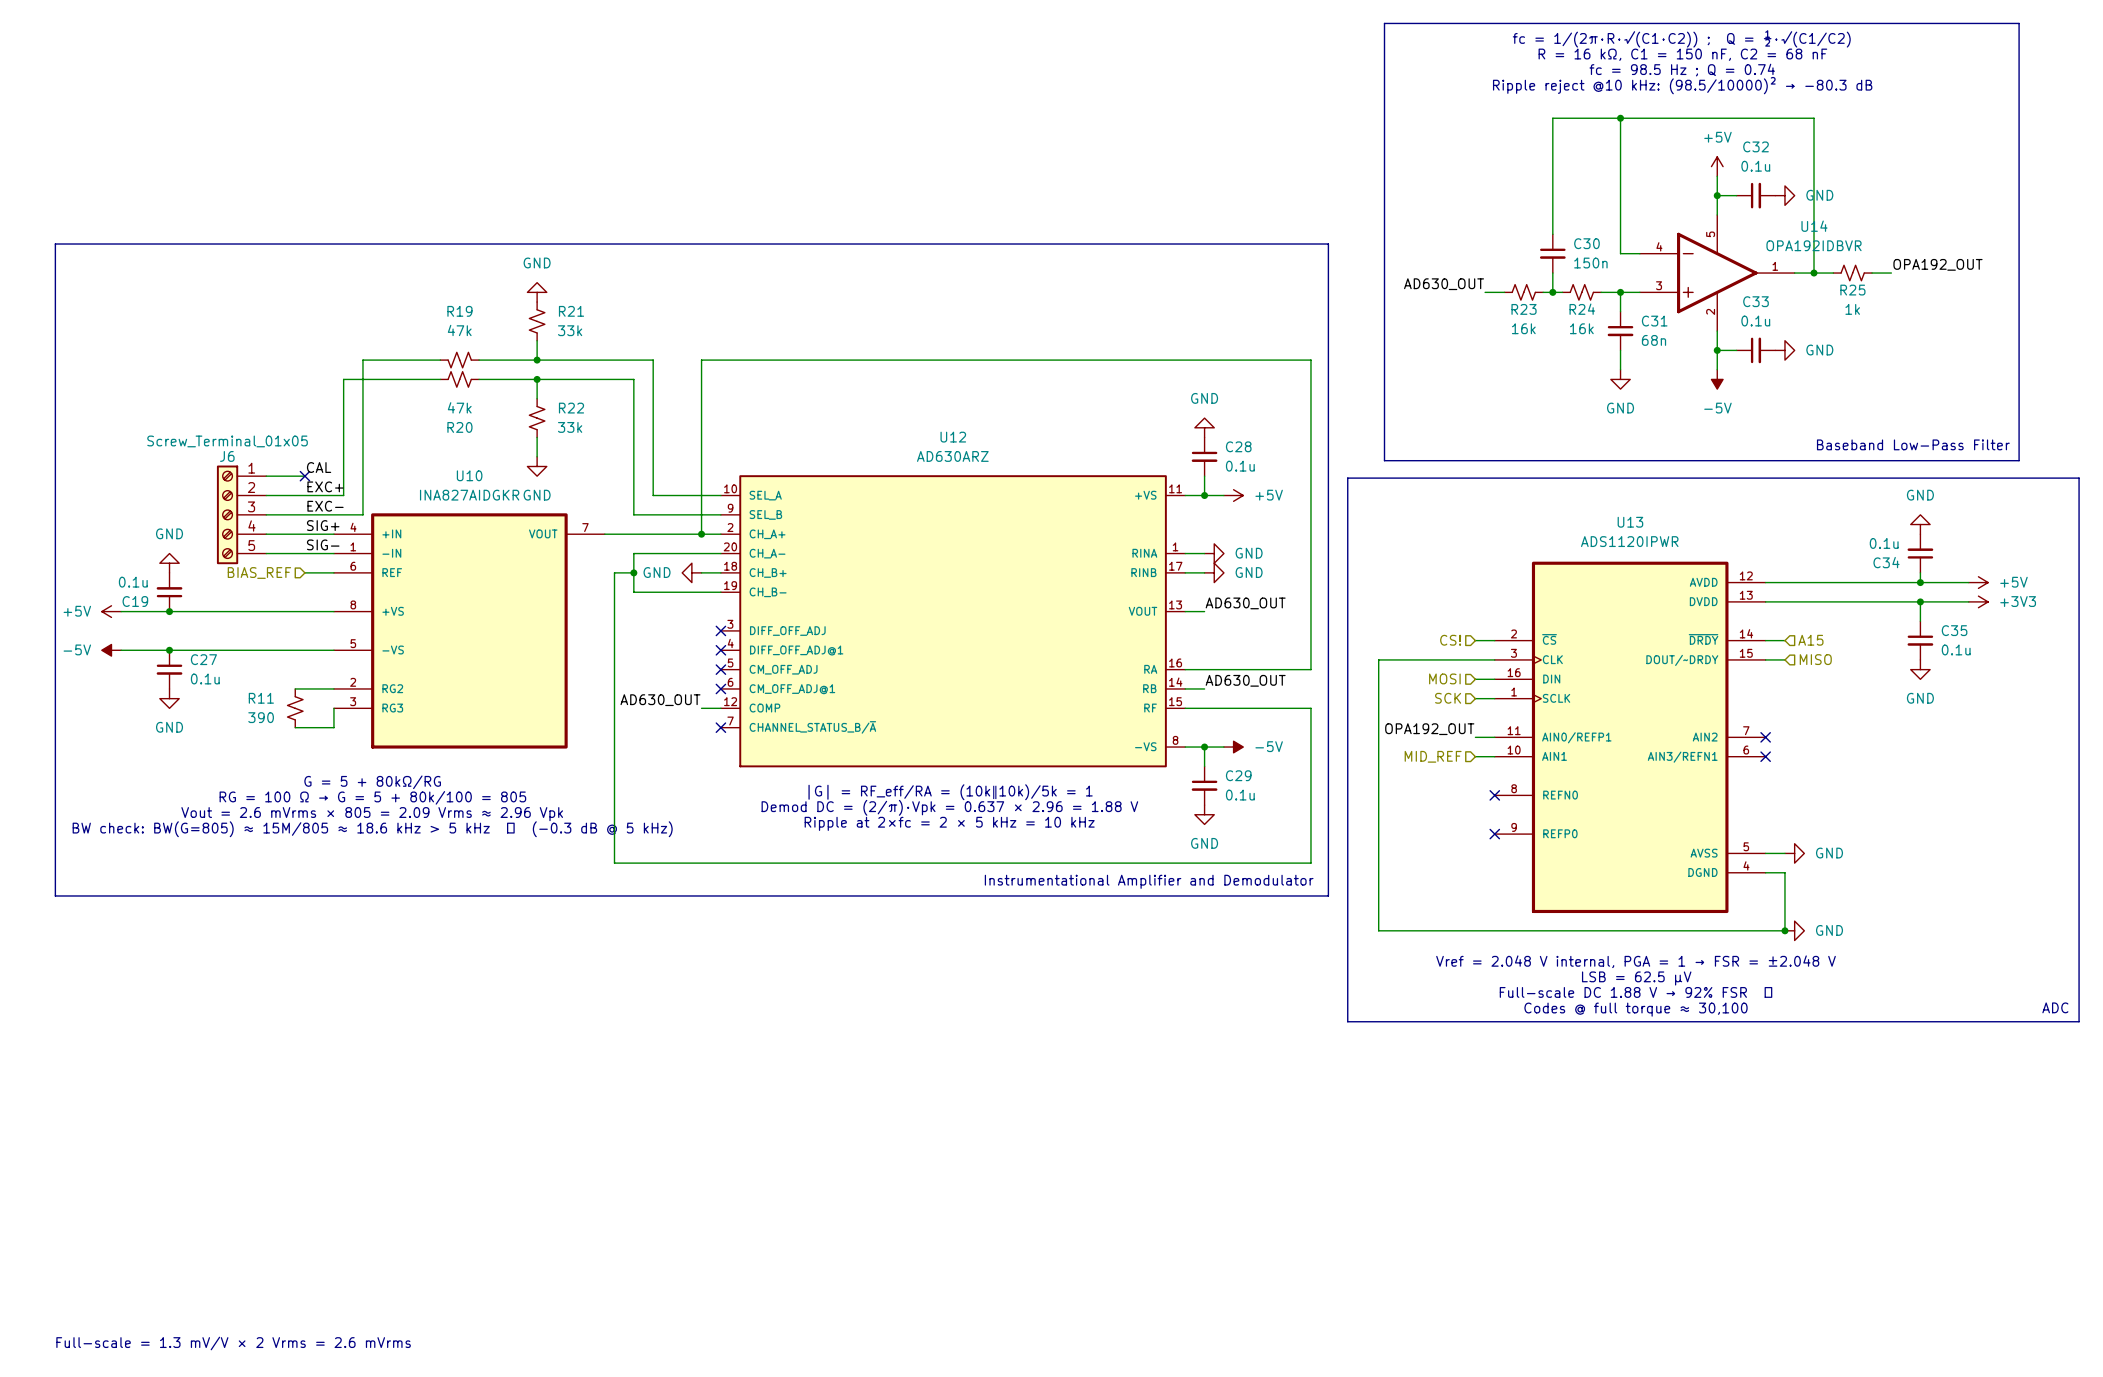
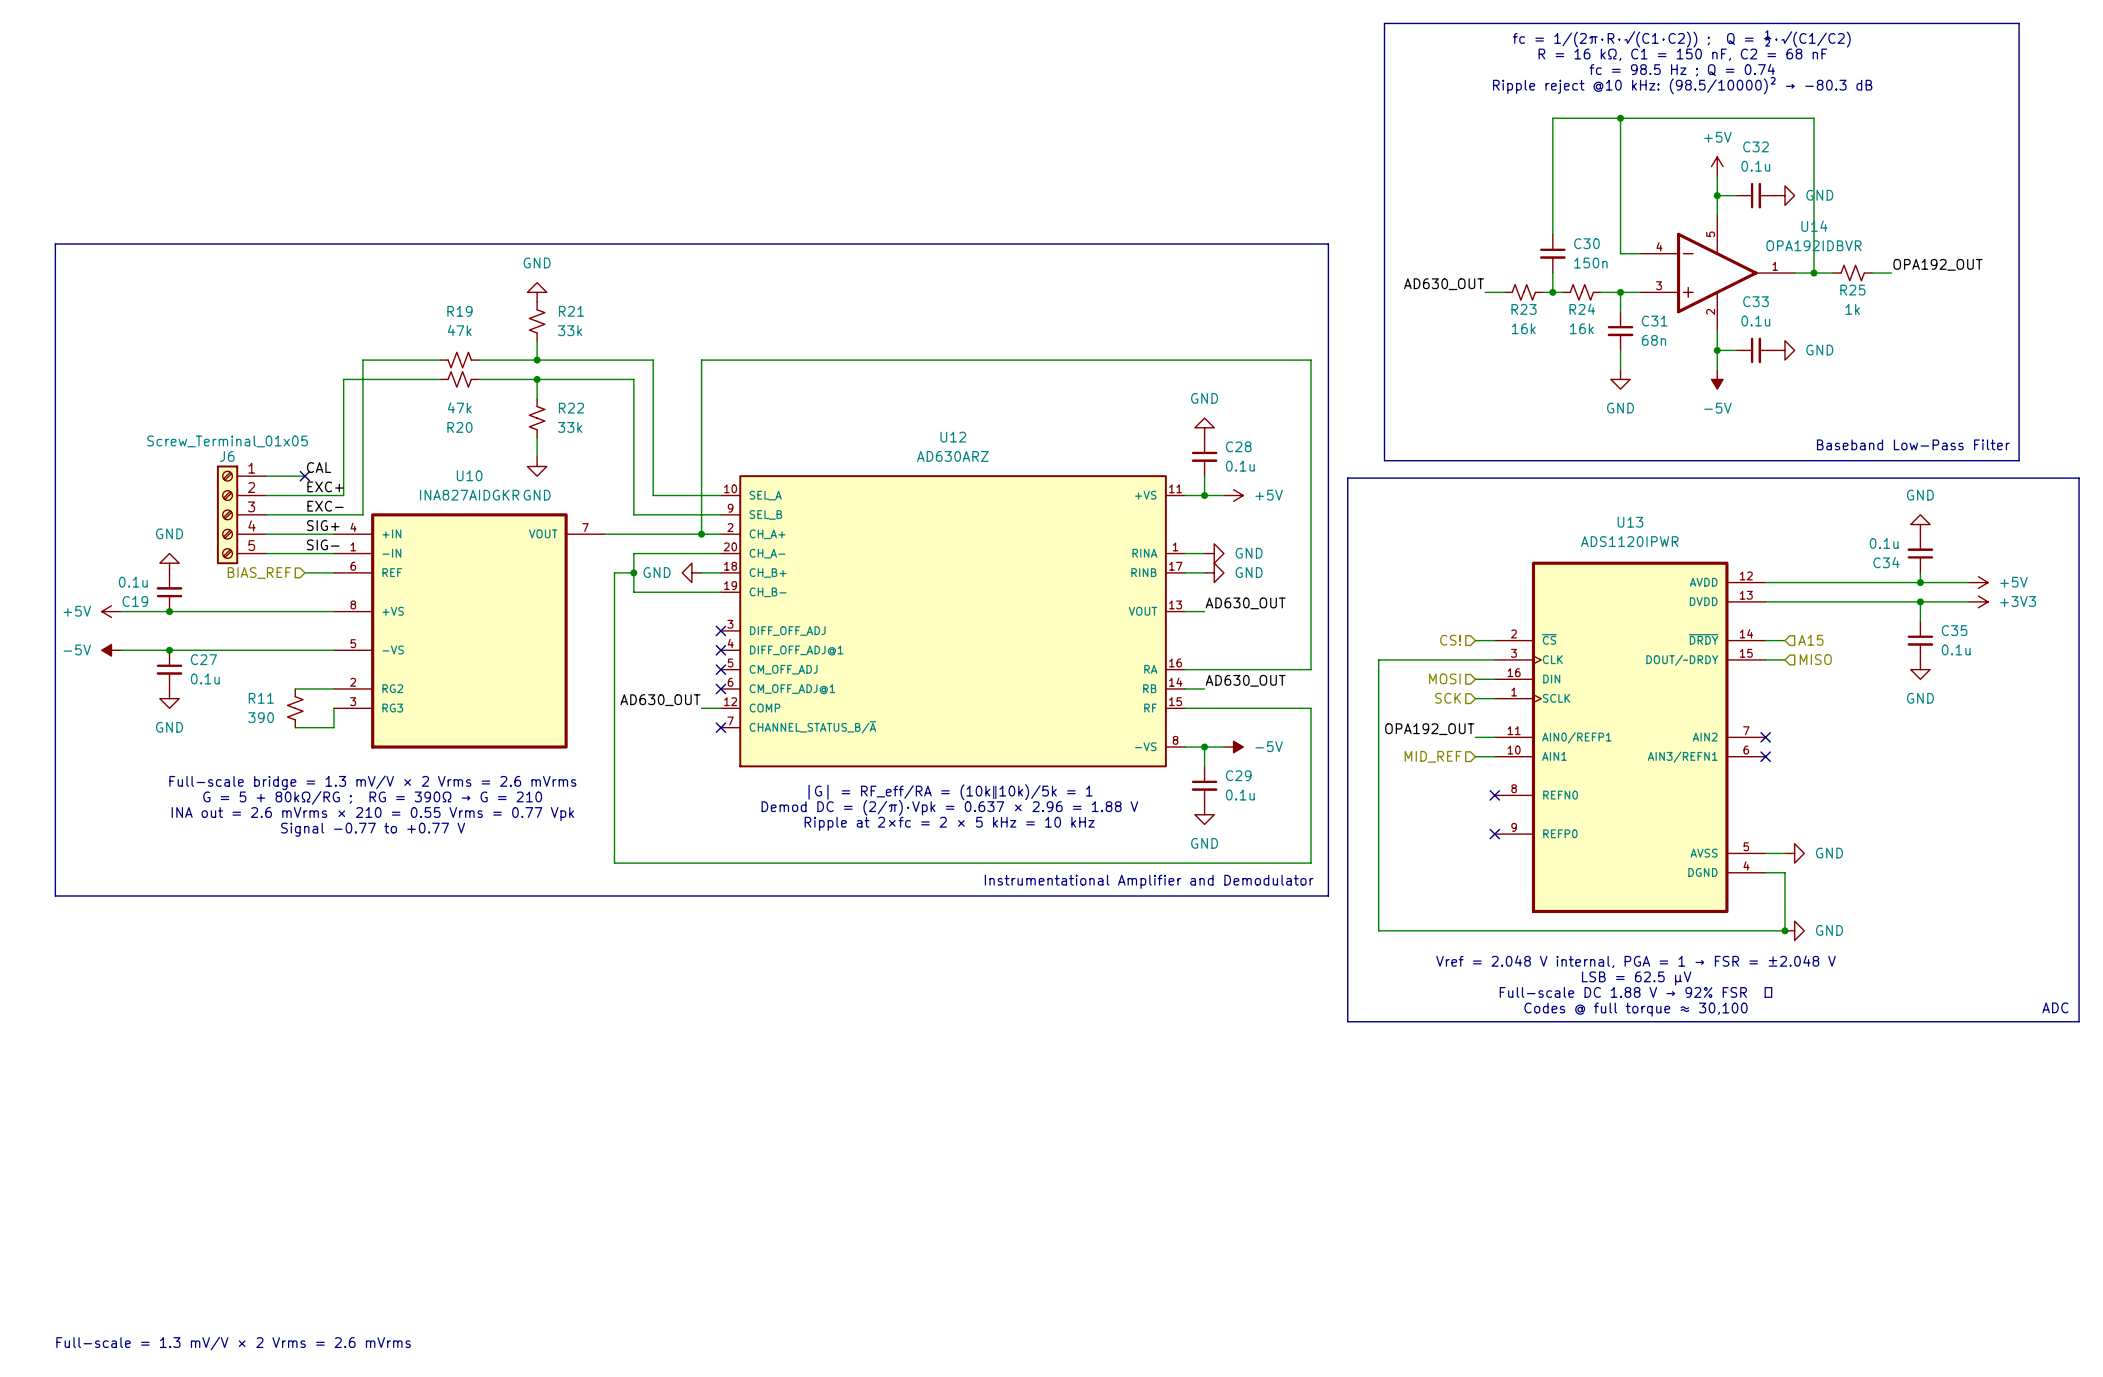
text: G = 5 + 80kΩ/RG (372, 782) -> Full-scale bridge = 1.3 mV/V × 2 Vrms = 2.6 mVrms (372, 782)
text: RG = 100 Ω → G = 5 + 80k/100 = 805 (372, 797) -> G = 5 + 80kΩ/RG ; RG = 390Ω → G = 210 (372, 797)
text: Vout = 2.6 mVrms × 805 = 2.09 Vrms ≈ 2.96 Vpk (372, 814) -> INA out = 2.6 mVrms × 210 = 0.55 Vrms = 0.77 Vpk (372, 814)
text: BW check: BW(G=805) ≈ 15M/805 ≈ 18.6 kHz > 5 kHz ✓ (−0.3 dB @ 5 kHz) (372, 829) -> Signal −0.77 to +0.77 V (373, 829)

